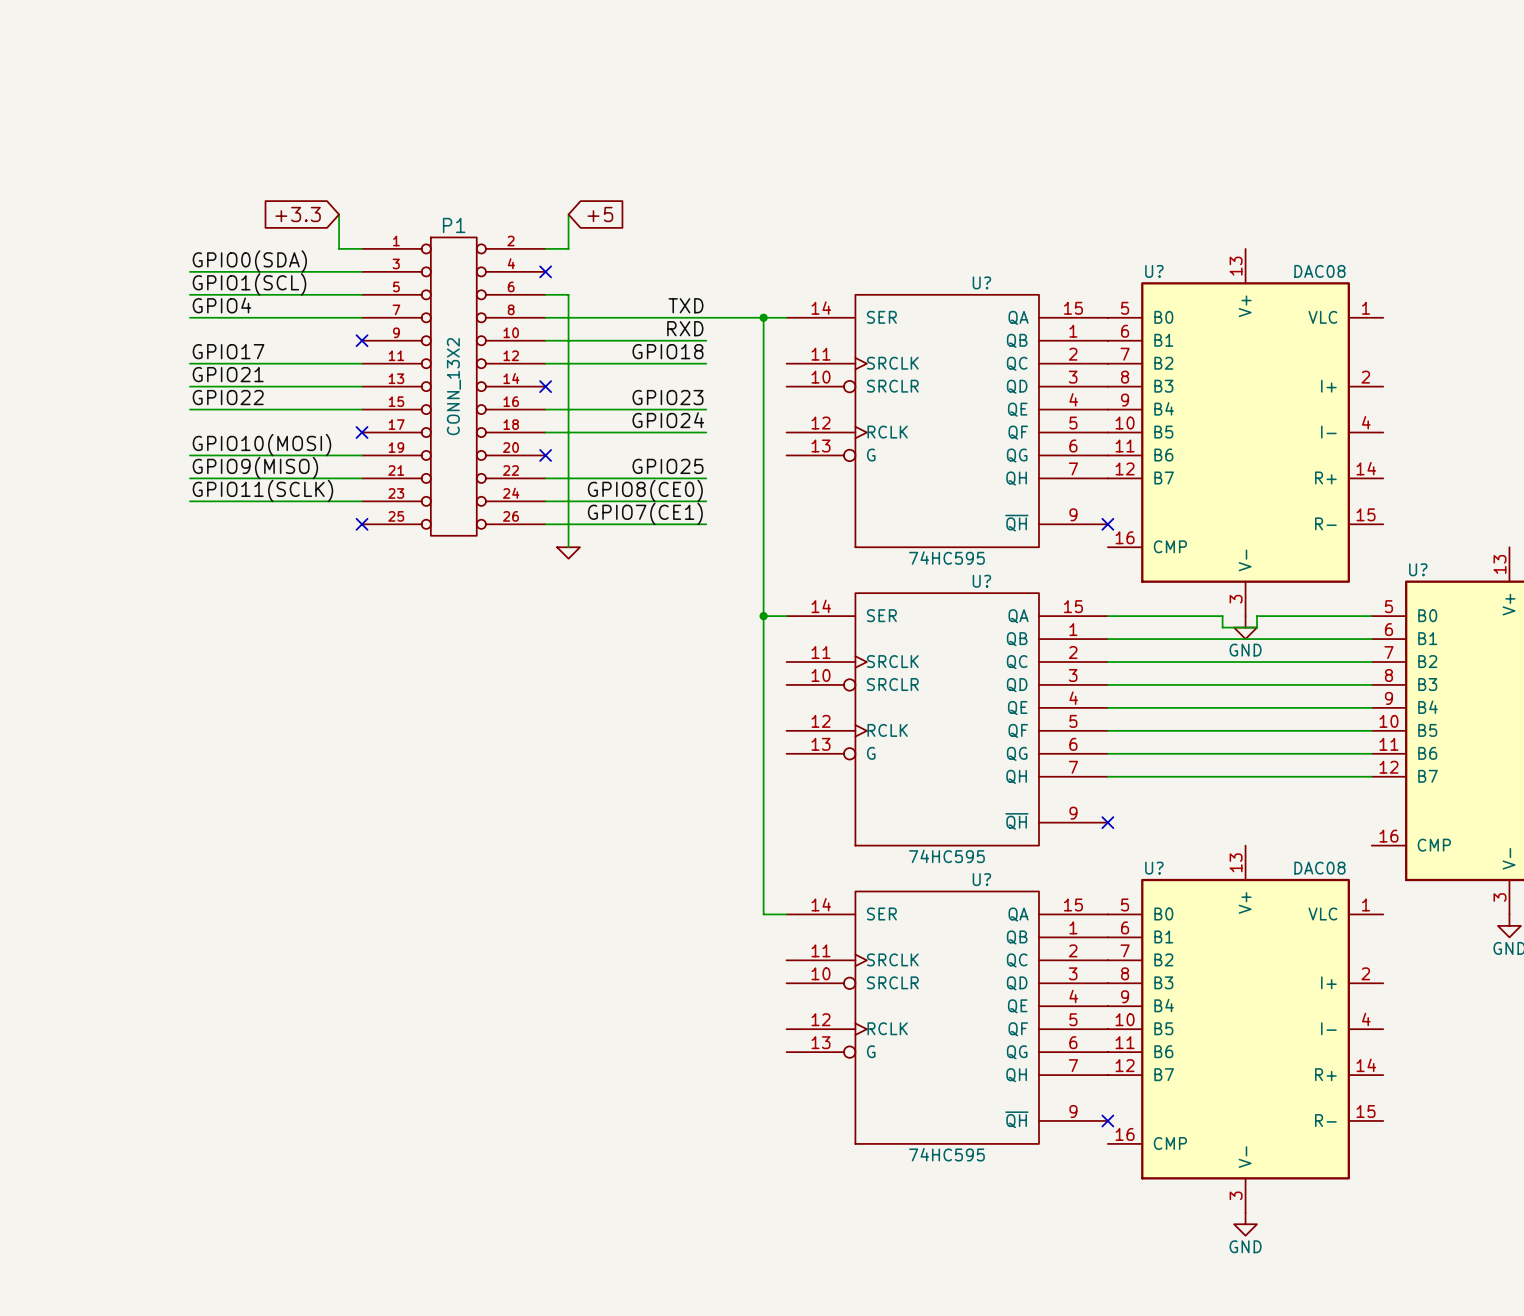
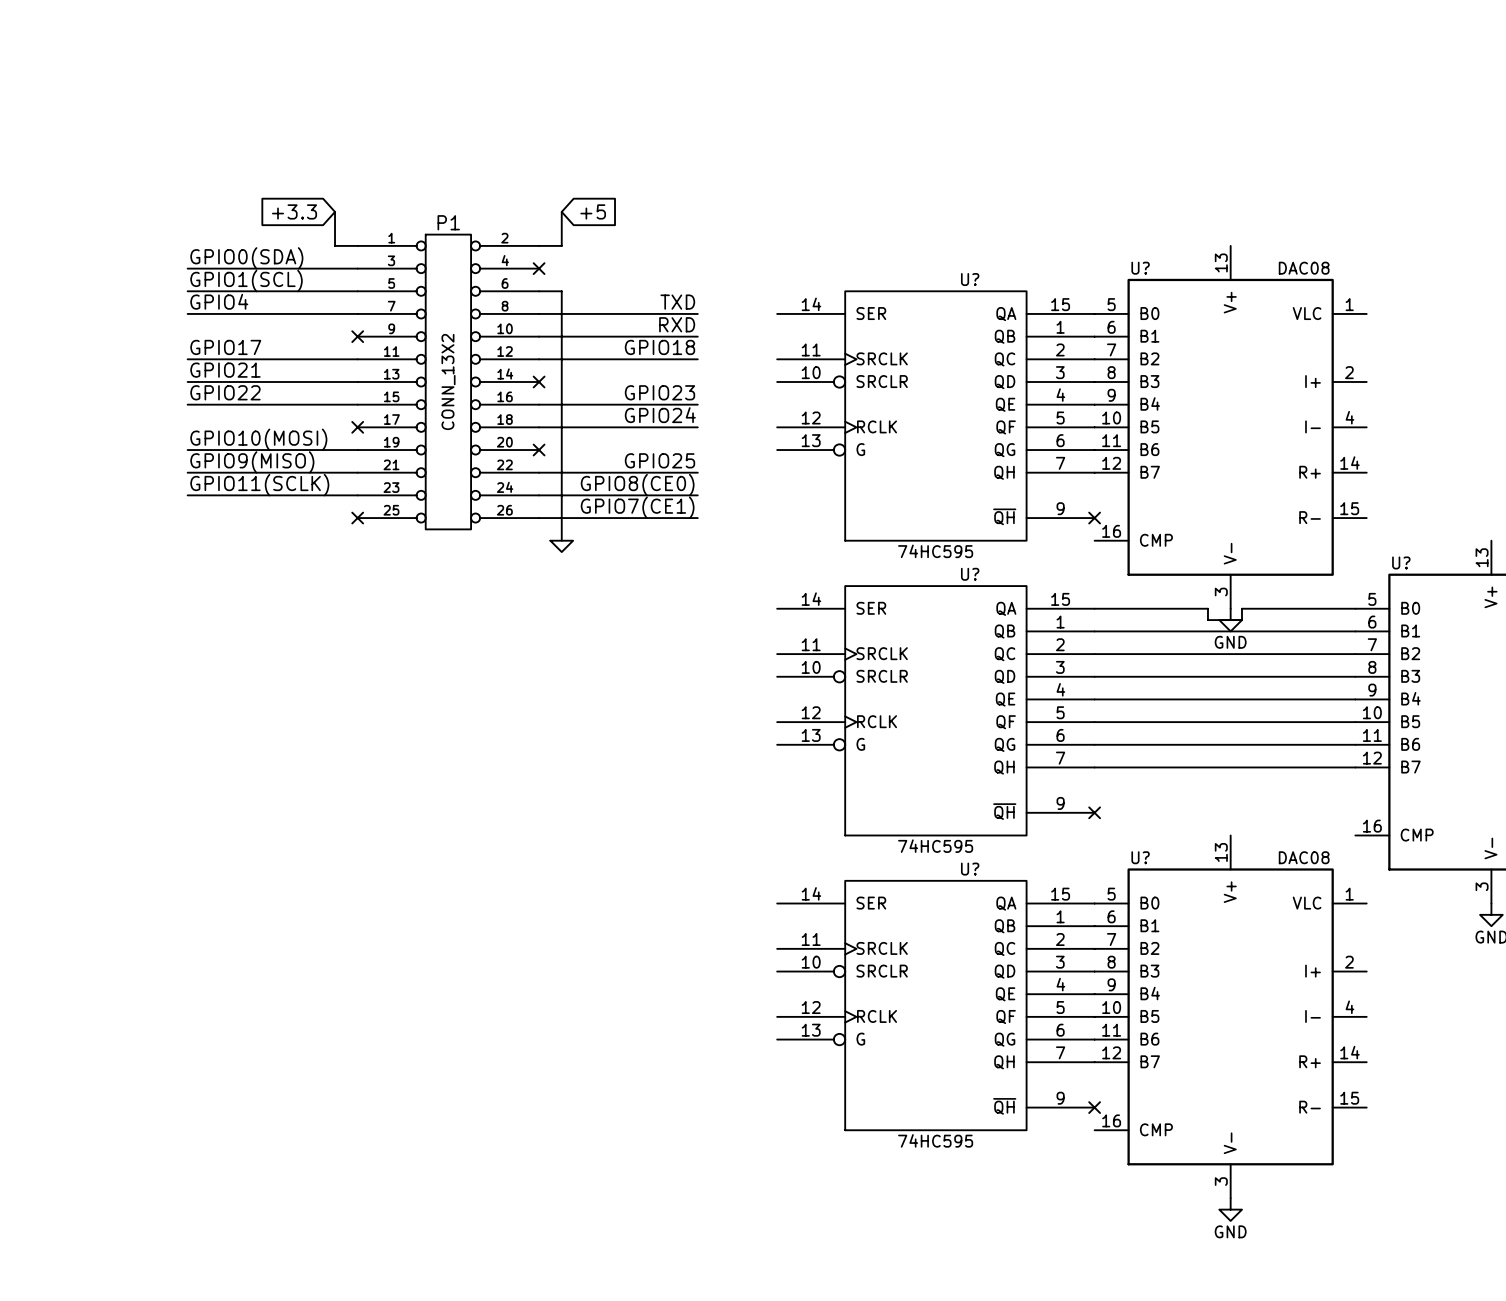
wire: (706, 317) (786, 317) -> none
wire: (763, 317) (763, 914) (786, 914) -> none
junction: (763, 317) -> none
wire: (763, 616) (786, 616) -> none
junction: (763, 616) -> none

